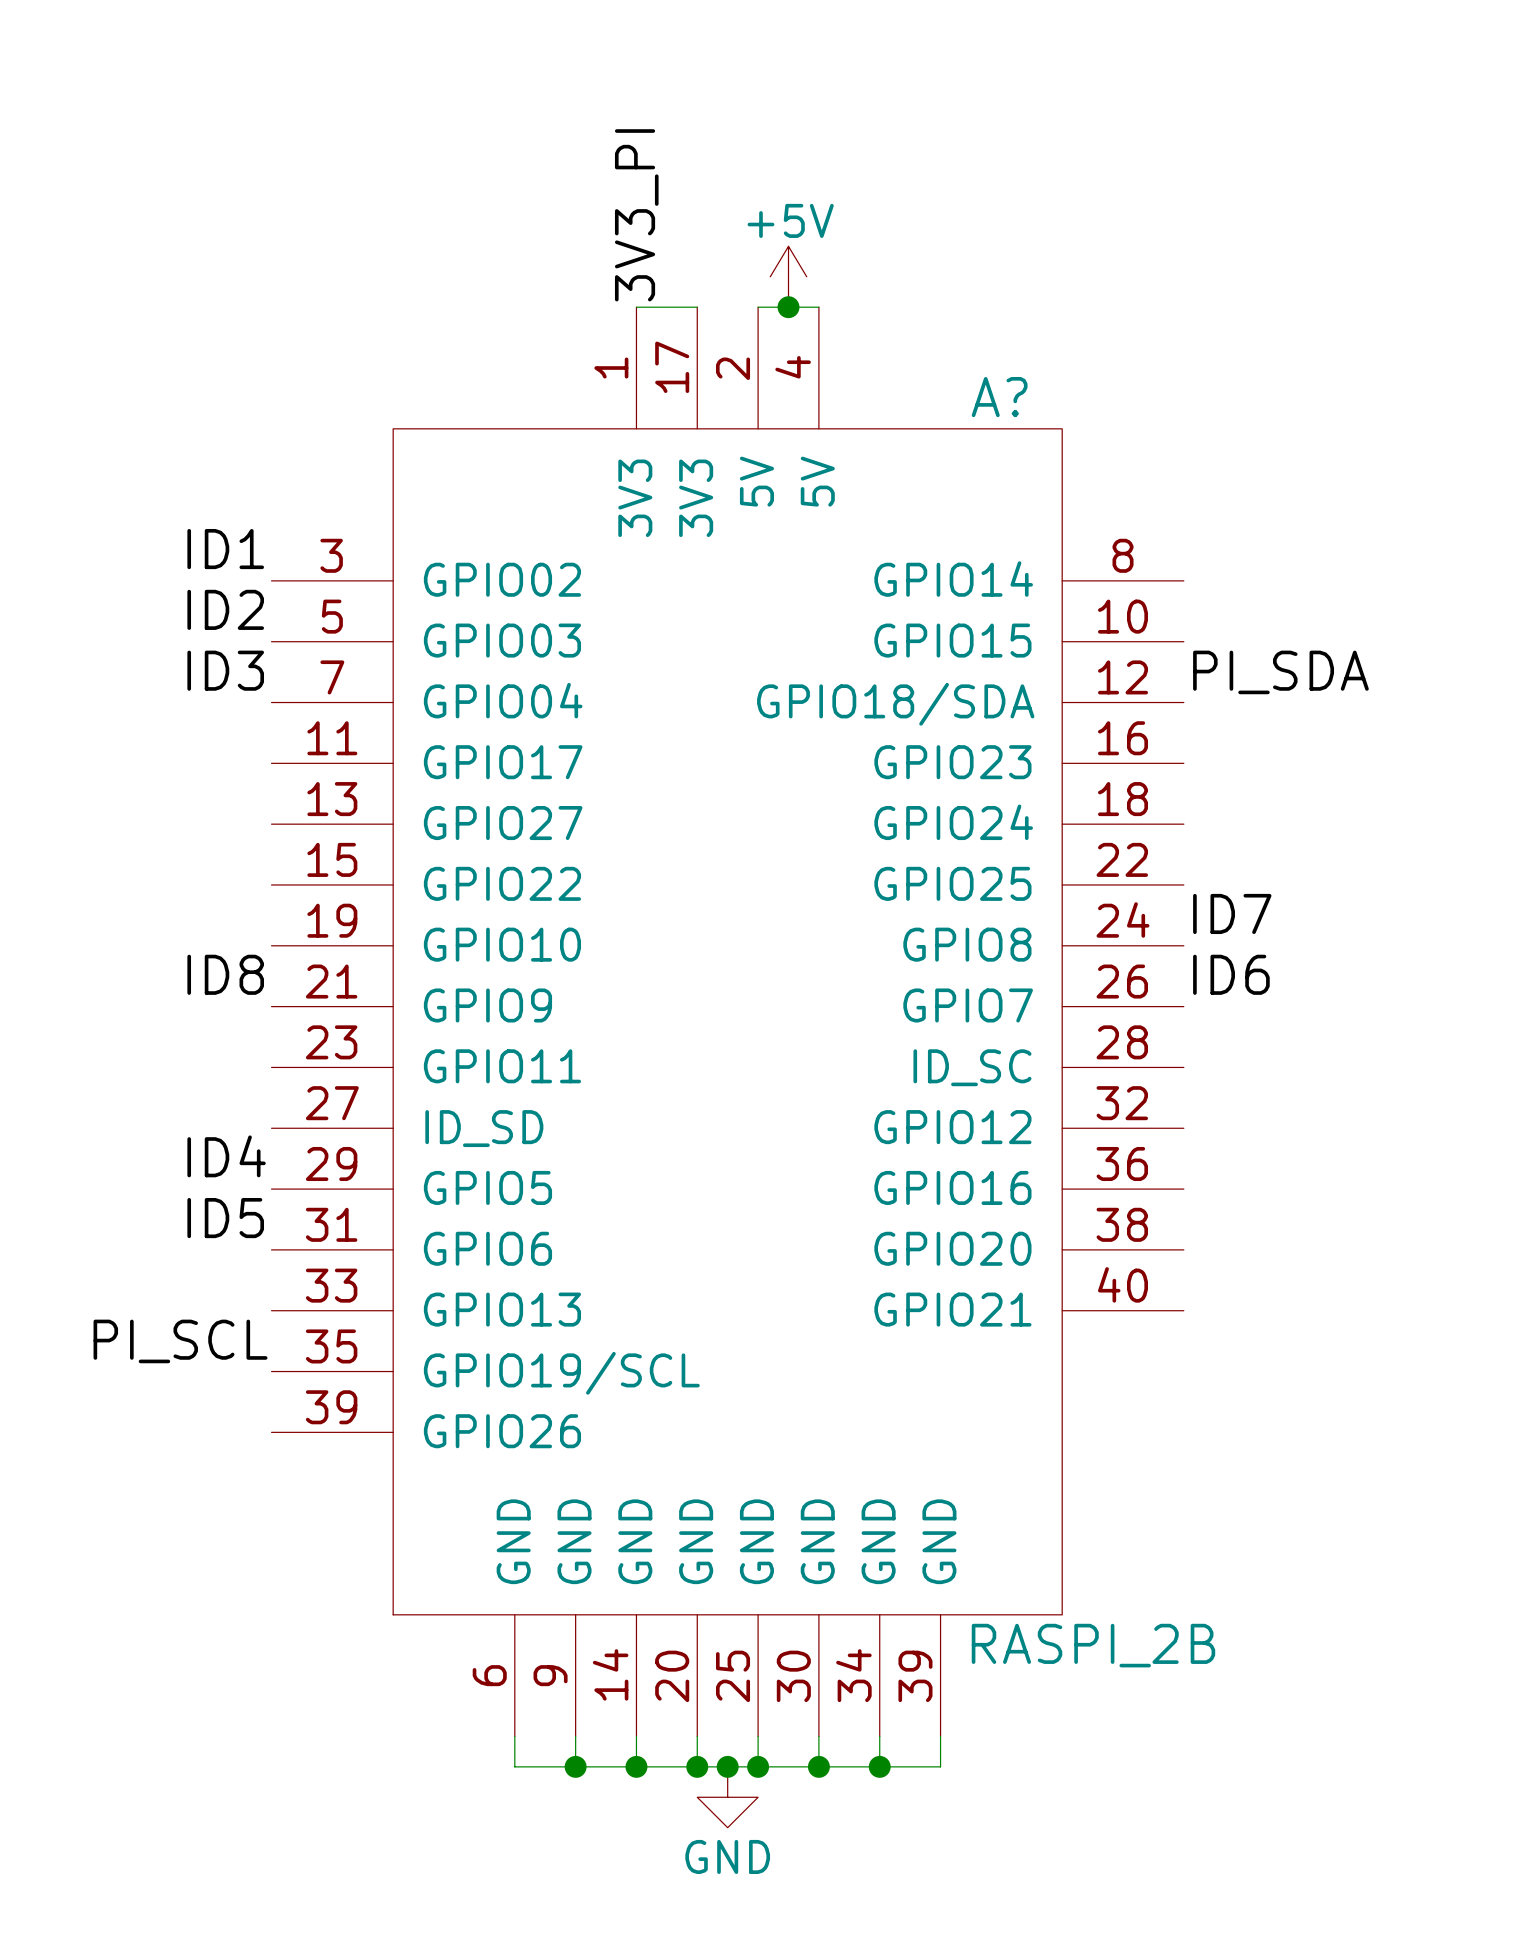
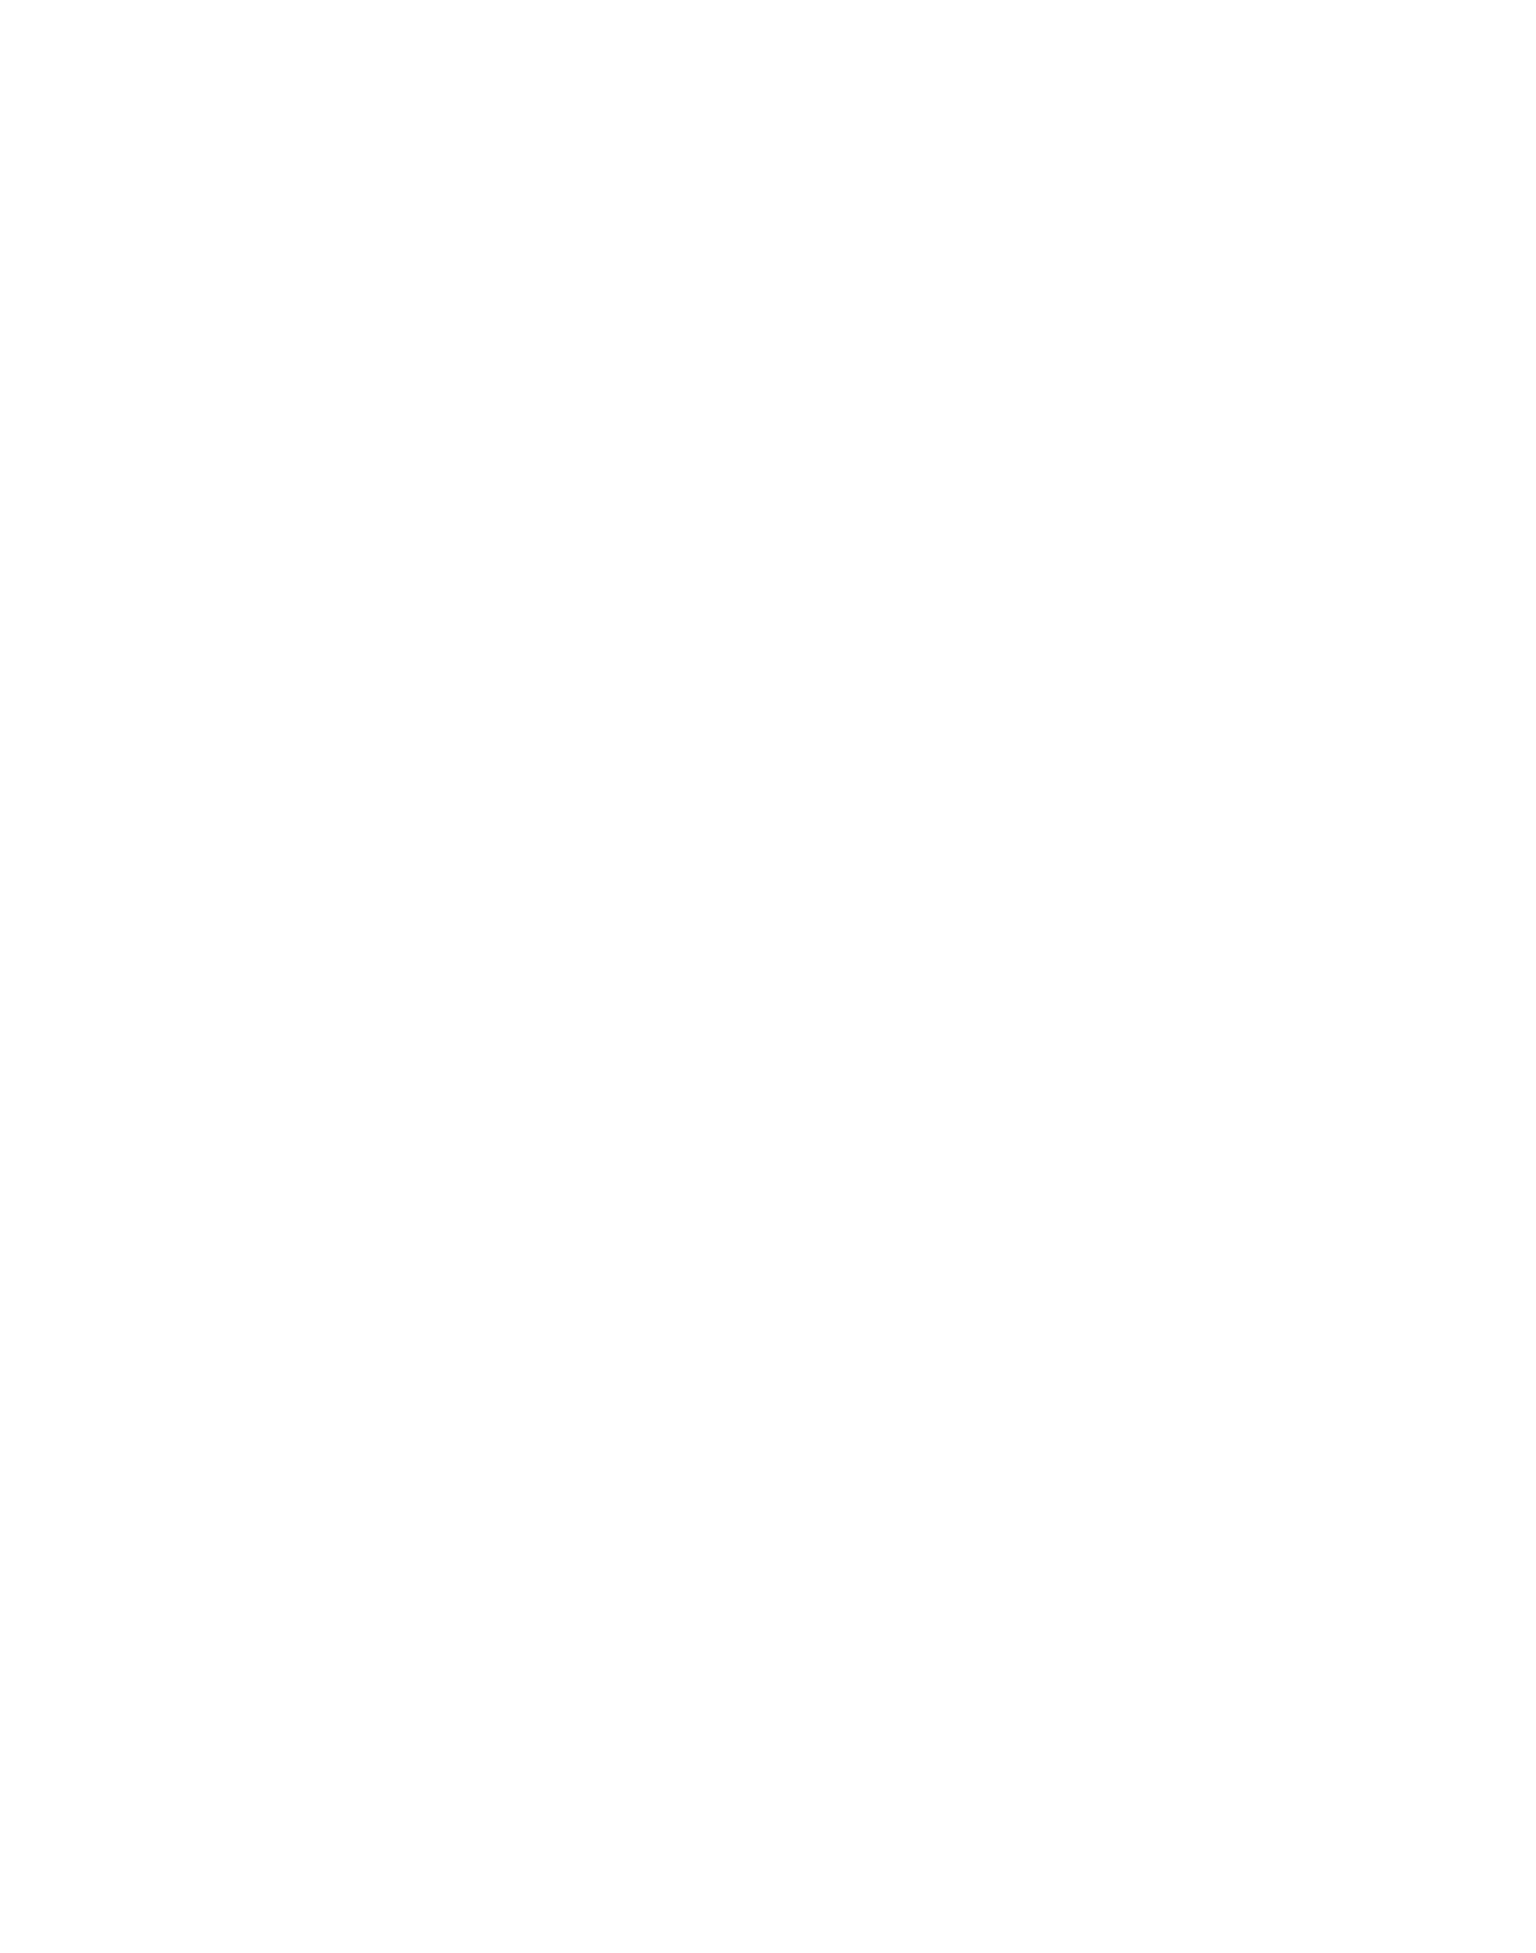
label: 3V3_PI (636, 215) -> none
power symbol: +5V (788, 276) -> none
wire: (636, 307) (697, 307) -> none
wire: (758, 307) (818, 307) -> none
junction: (788, 307) -> none
label: ID1 (225, 549) -> none
label: ID2 (225, 609) -> none
label: ID3 (225, 670) -> none
label: PI_SDA (1280, 672) -> none
label: ID7 (1232, 913) -> none
label: ID8 (225, 974) -> none
label: ID6 (1231, 974) -> none
A?: RASPI_2B (727, 1021) -> none
label: ID4 (226, 1156) -> none
label: ID5 (225, 1218) -> none
label: PI_SCL (180, 1341) -> none
wire: (514, 1736) (514, 1766) (940, 1766) (940, 1736) -> none
wire: (575, 1736) (575, 1766) -> none
wire: (636, 1736) (636, 1766) -> none
wire: (697, 1736) (697, 1766) -> none
wire: (758, 1736) (758, 1766) -> none
wire: (818, 1736) (818, 1766) -> none
wire: (879, 1736) (879, 1766) -> none
junction: (575, 1766) -> none
junction: (636, 1766) -> none
junction: (697, 1766) -> none
junction: (727, 1766) -> none
junction: (758, 1766) -> none
junction: (818, 1766) -> none
junction: (879, 1766) -> none
power symbol: GND (727, 1797) -> none

